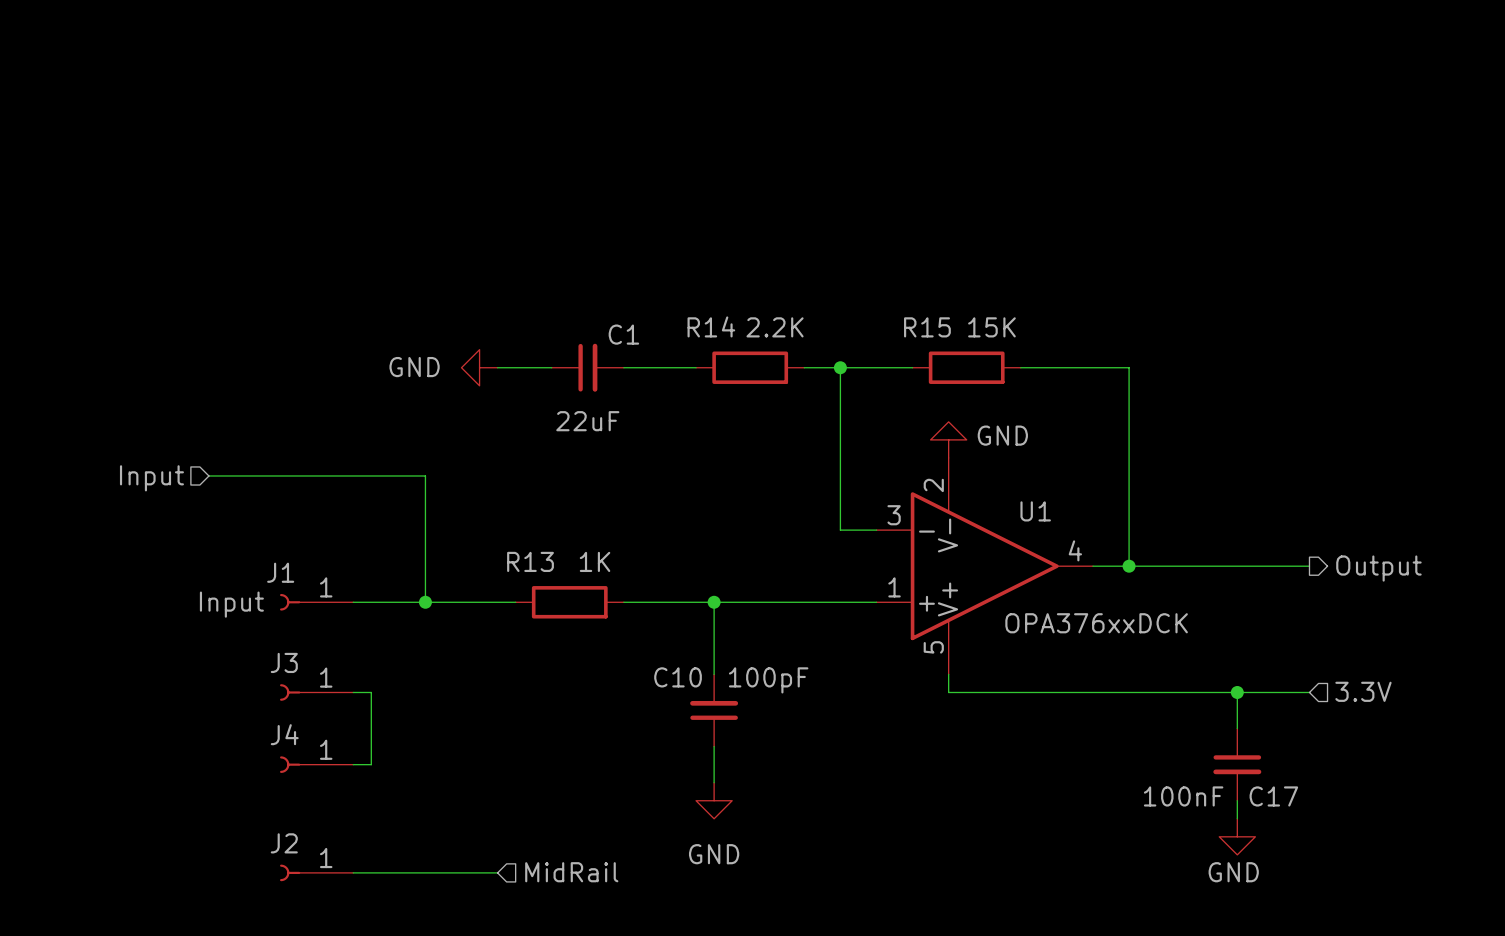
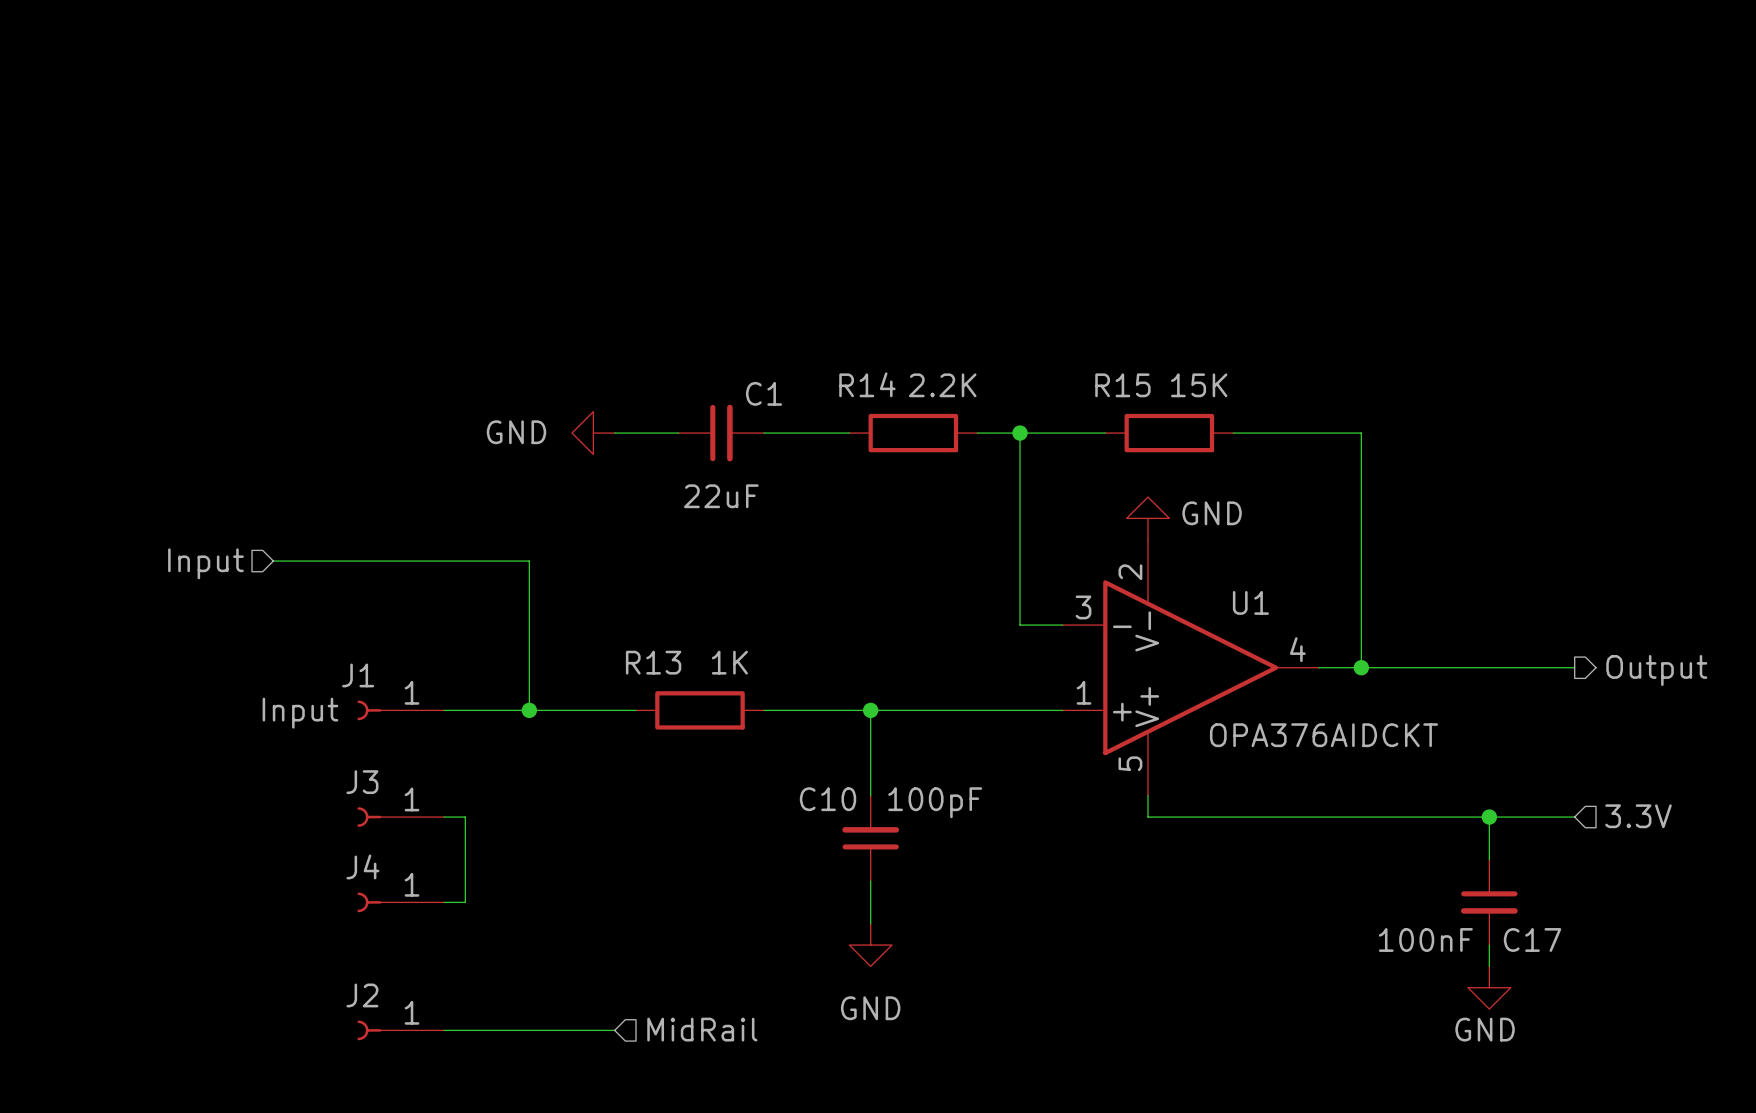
U1 value: OPA376xxDCK (1096, 623) -> OPA376AIDCKT (1323, 735)

